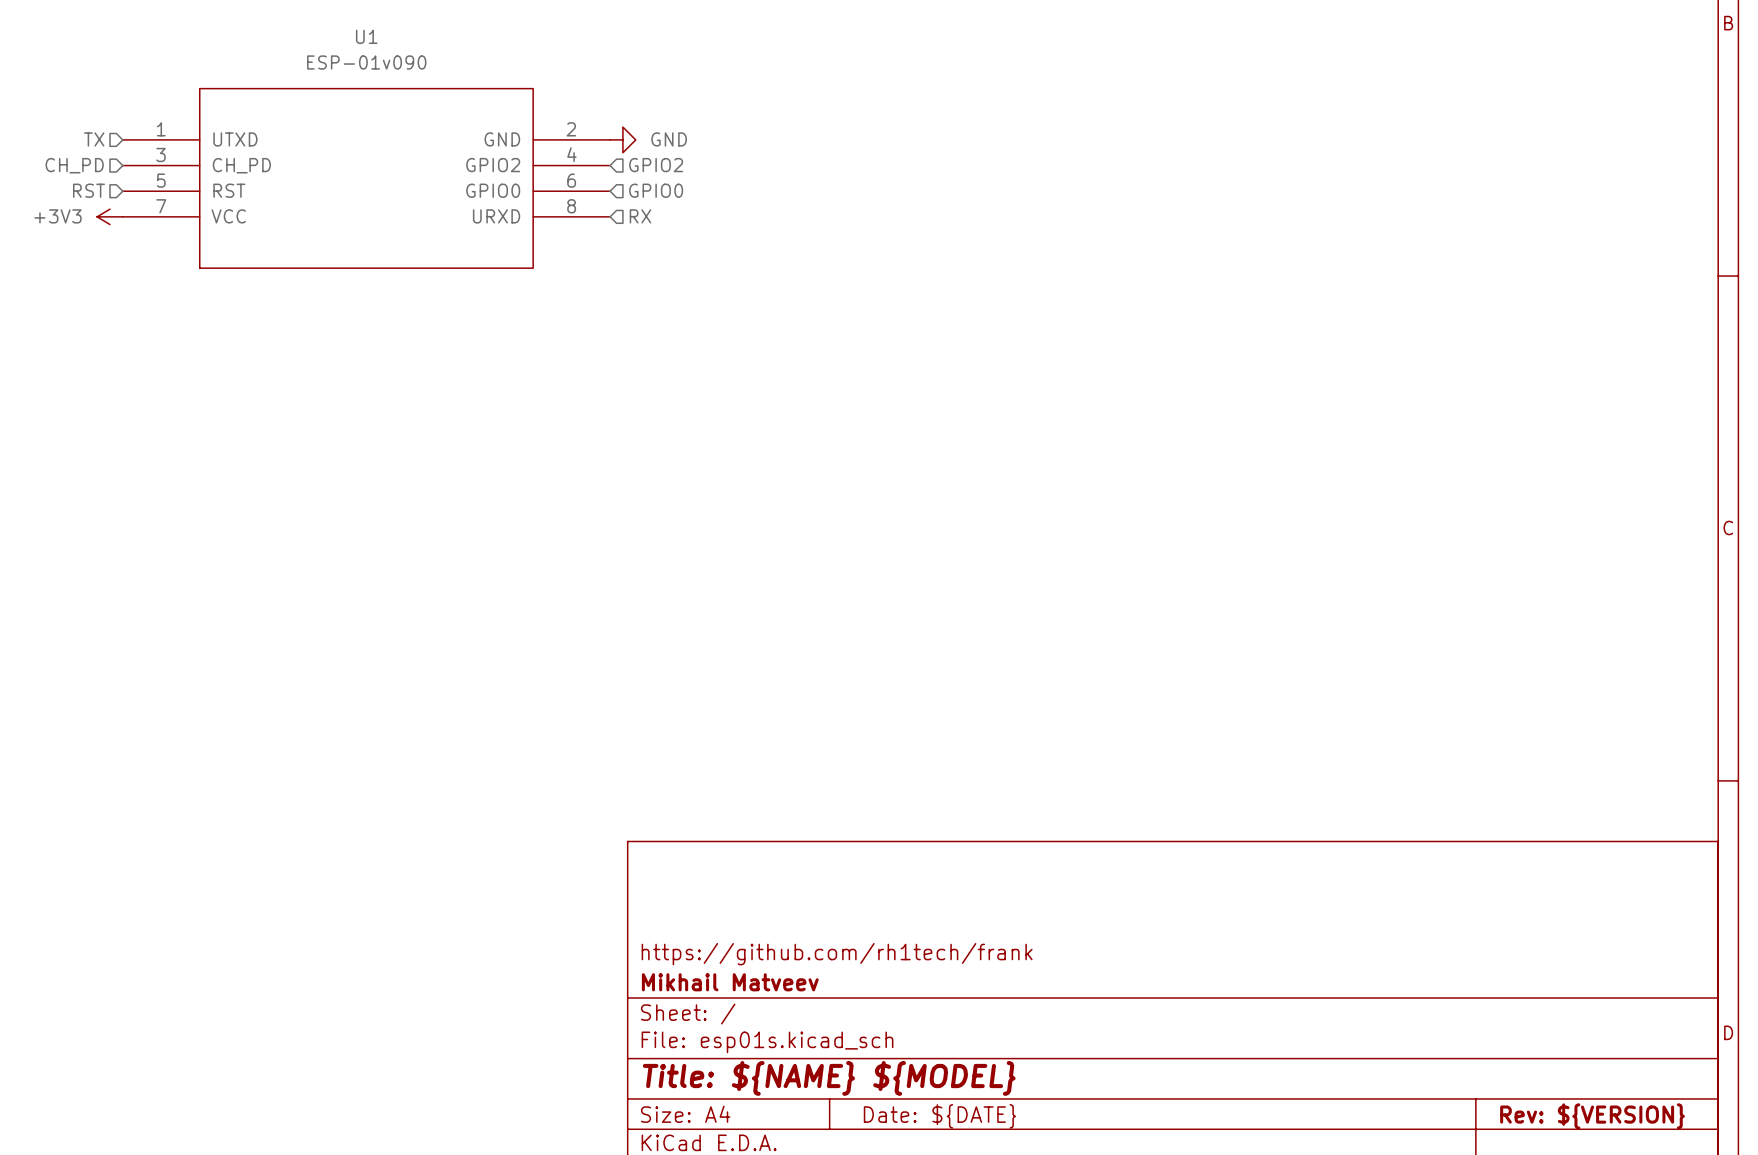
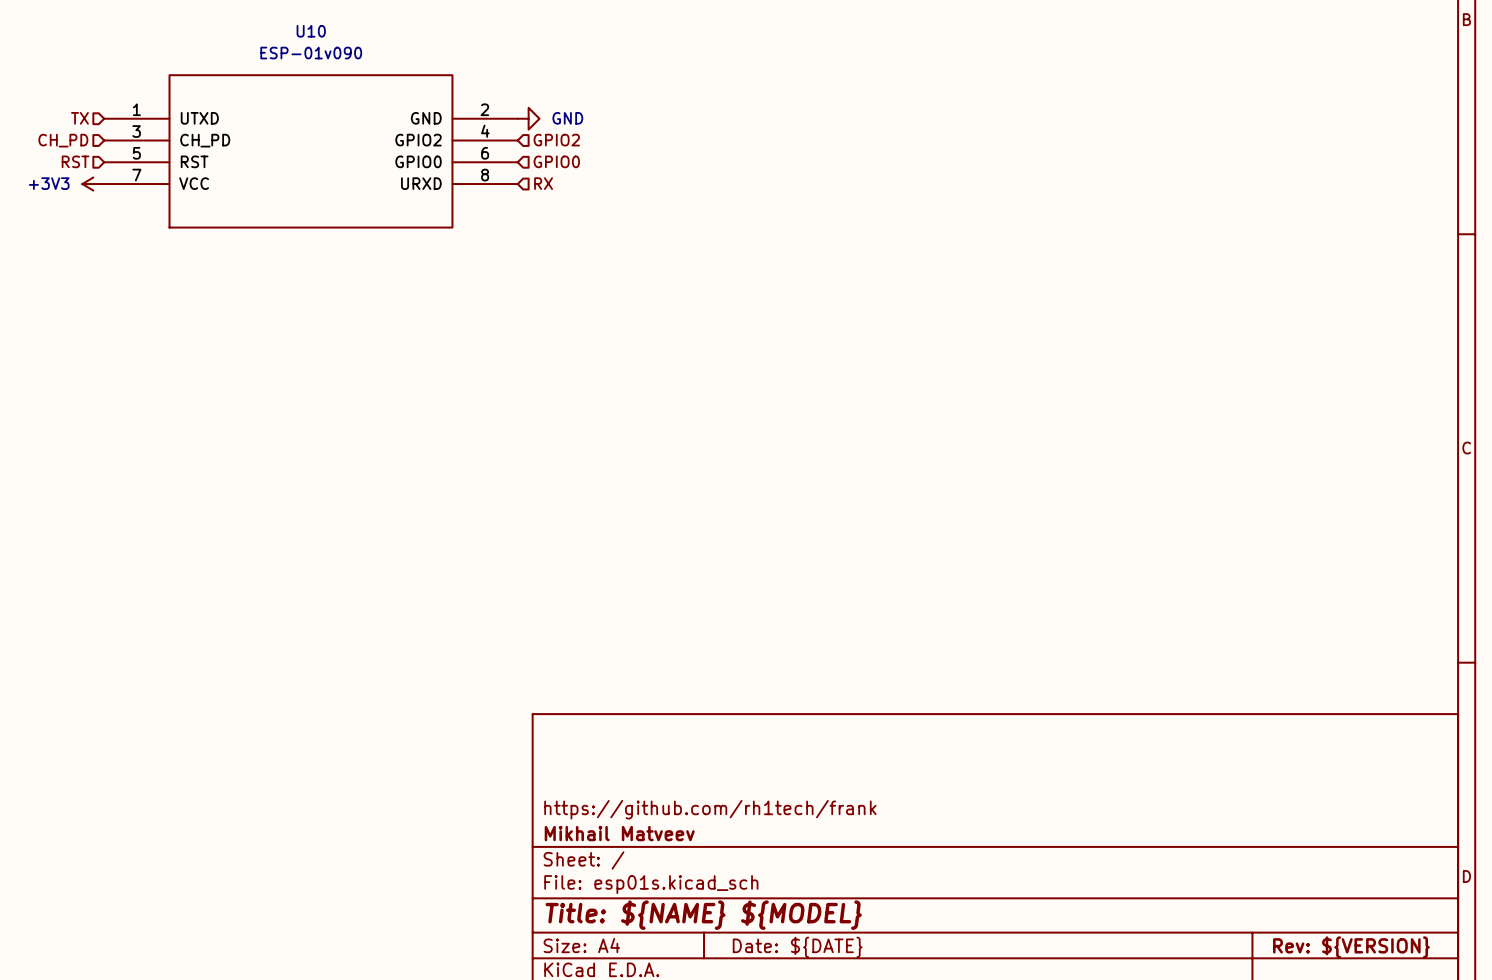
U1 name: U1 (366, 36) -> U10 (311, 31)

